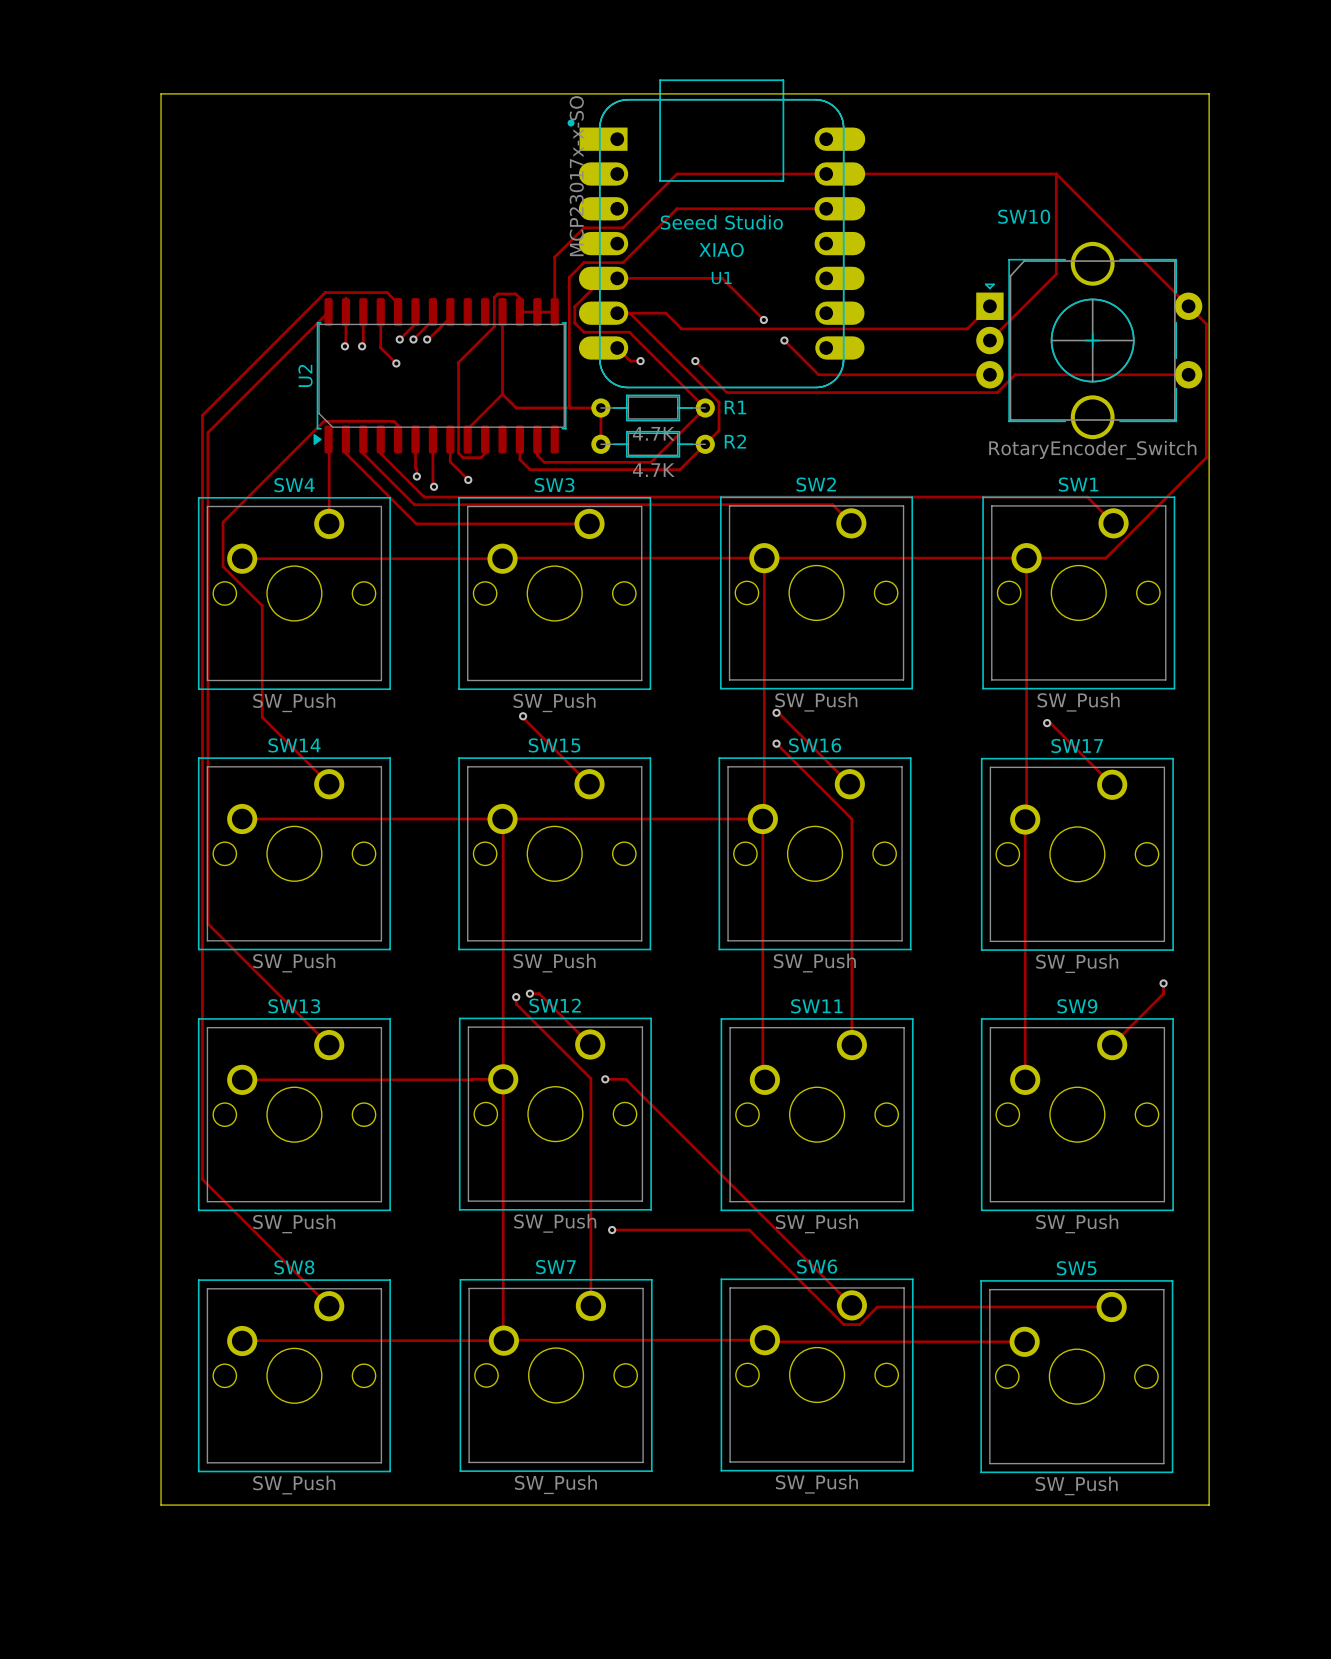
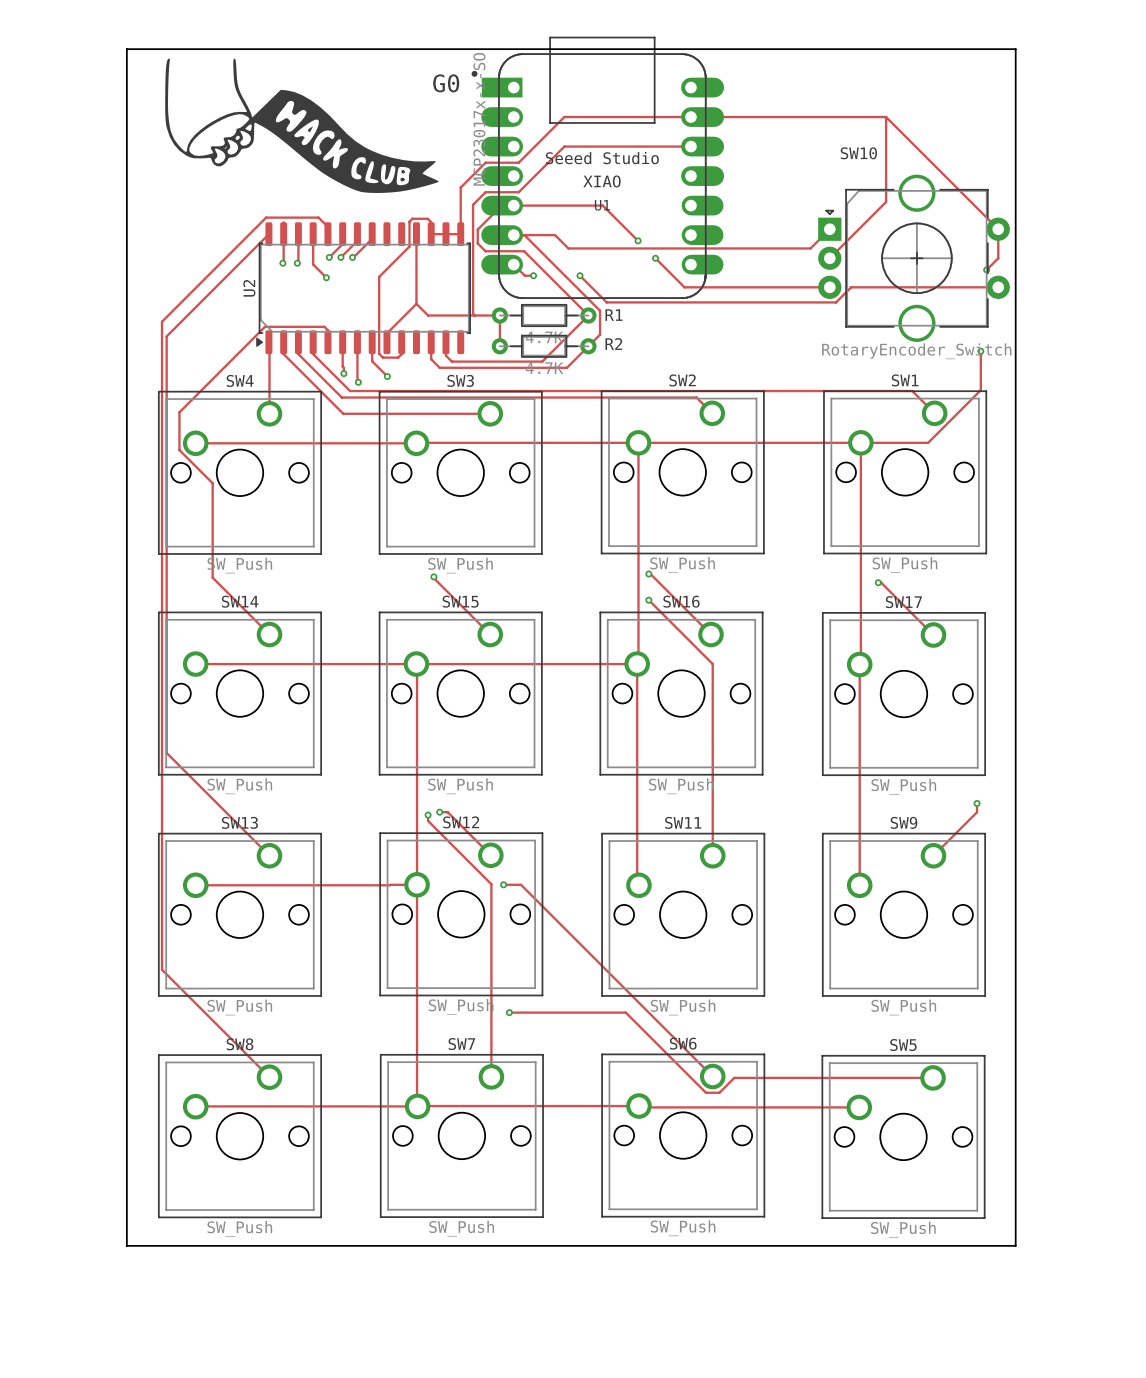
G0: none -> (302, 125)
track: (1188, 306) (1206, 324) (1206, 457) (1168, 496) -> (998, 229) (998, 258) (986, 269)
via: none -> (986, 269)
track: none -> (980, 351) (980, 390)
via: none -> (980, 351)

